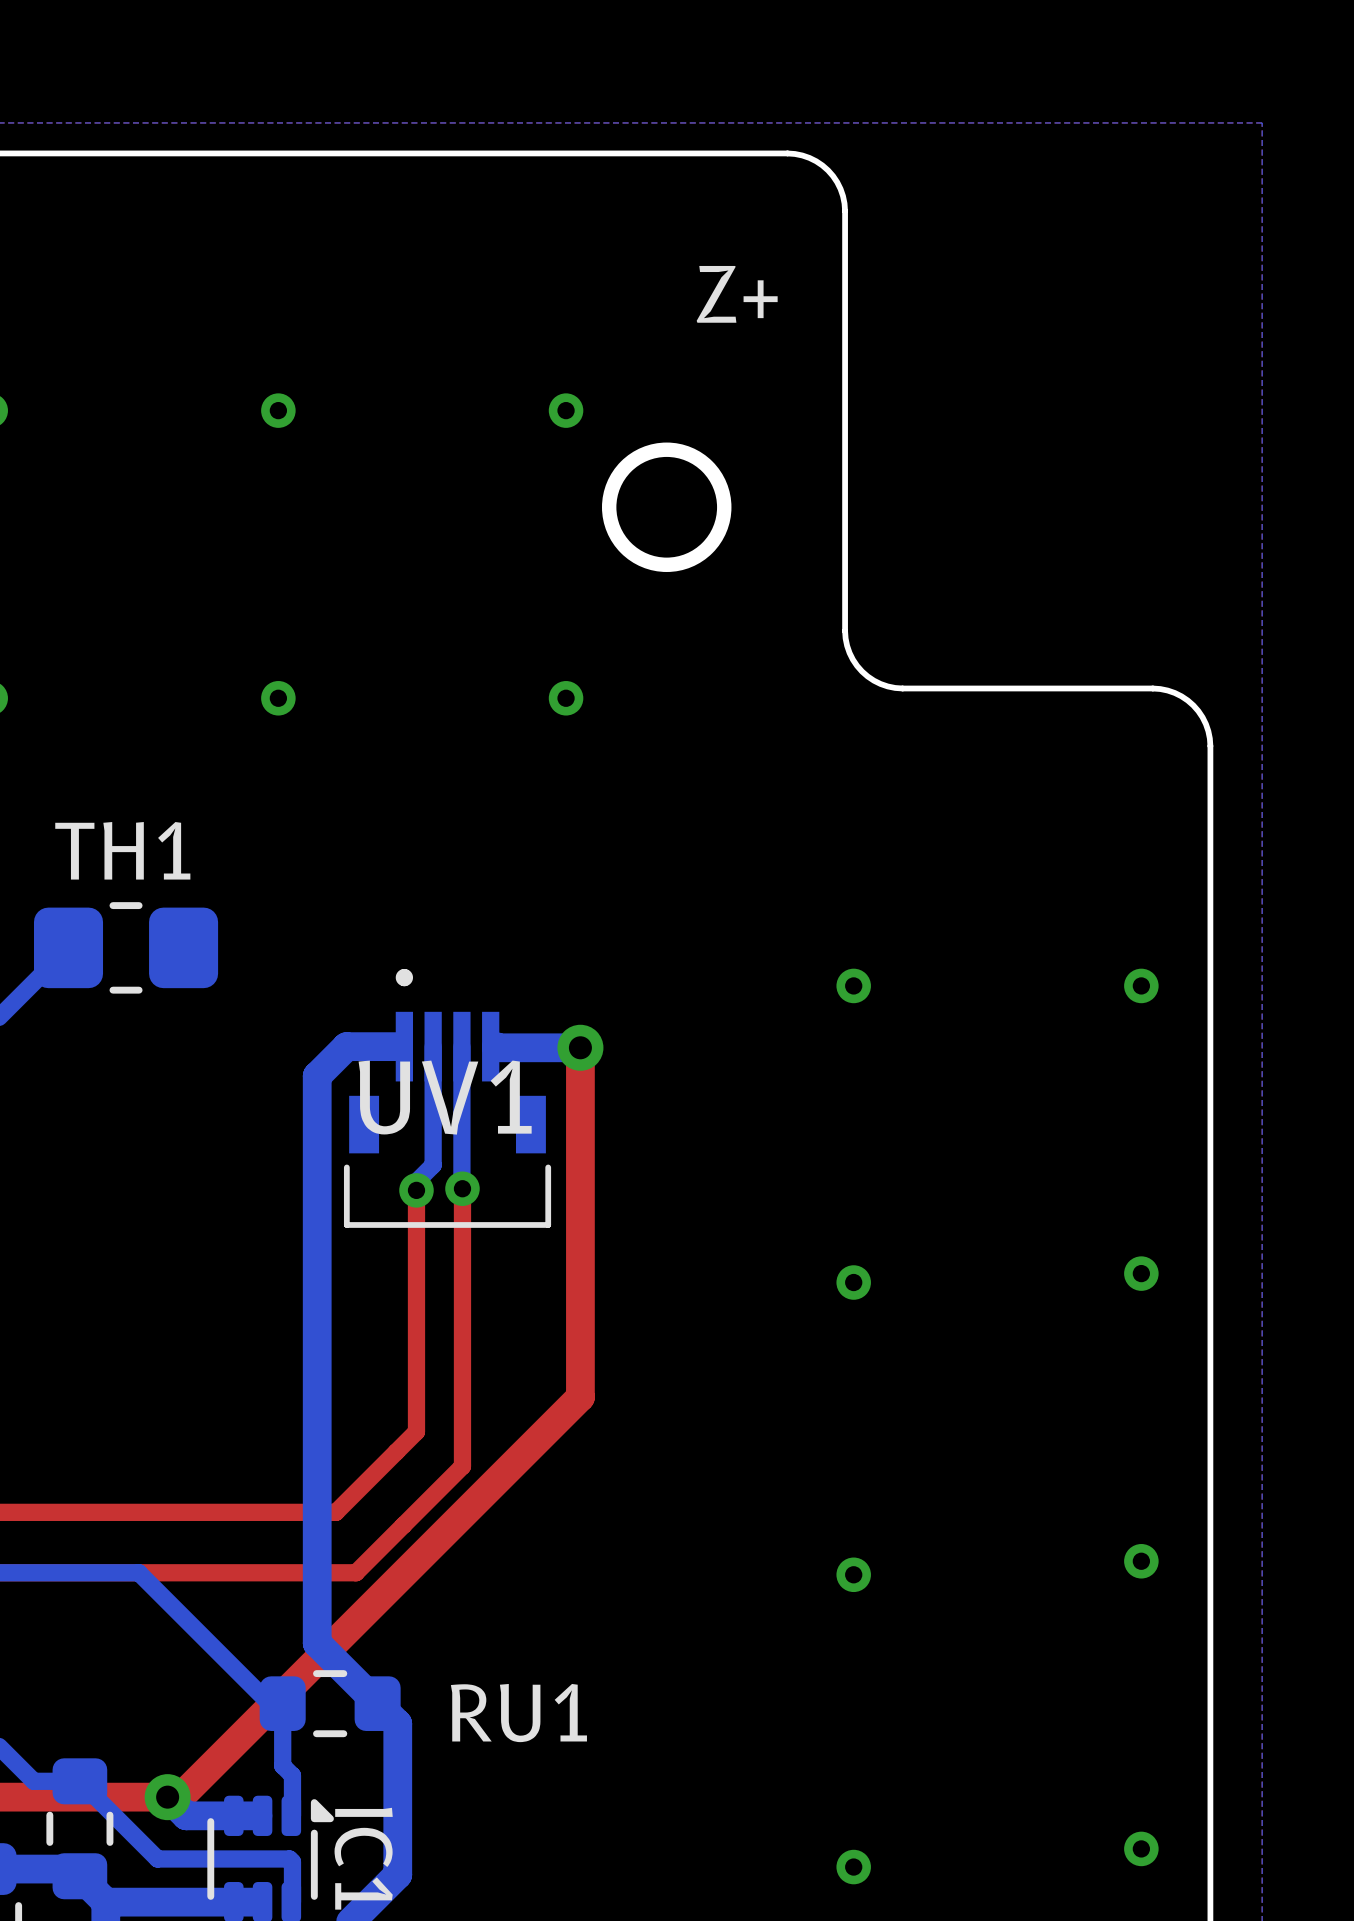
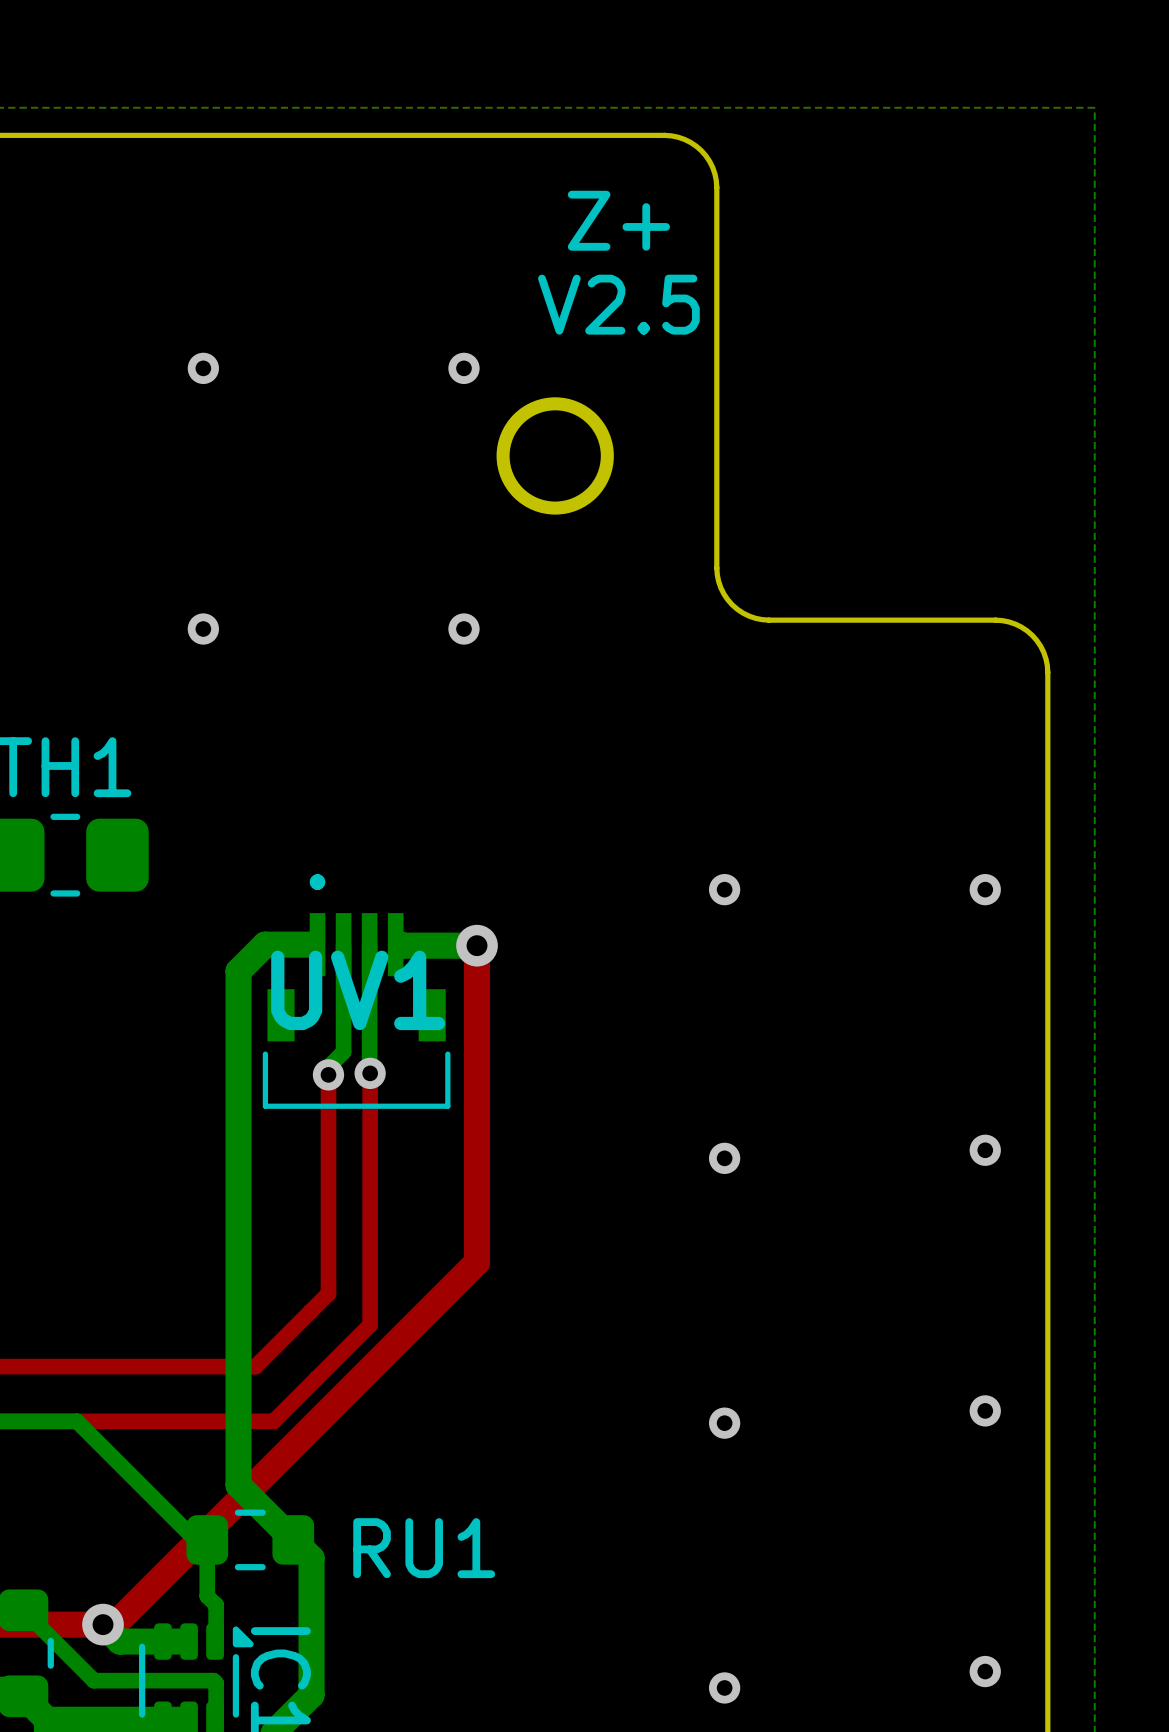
text position: Z+ (737, 294) -> Z+ (618, 220)
text: none -> V2.5 (618, 304)

